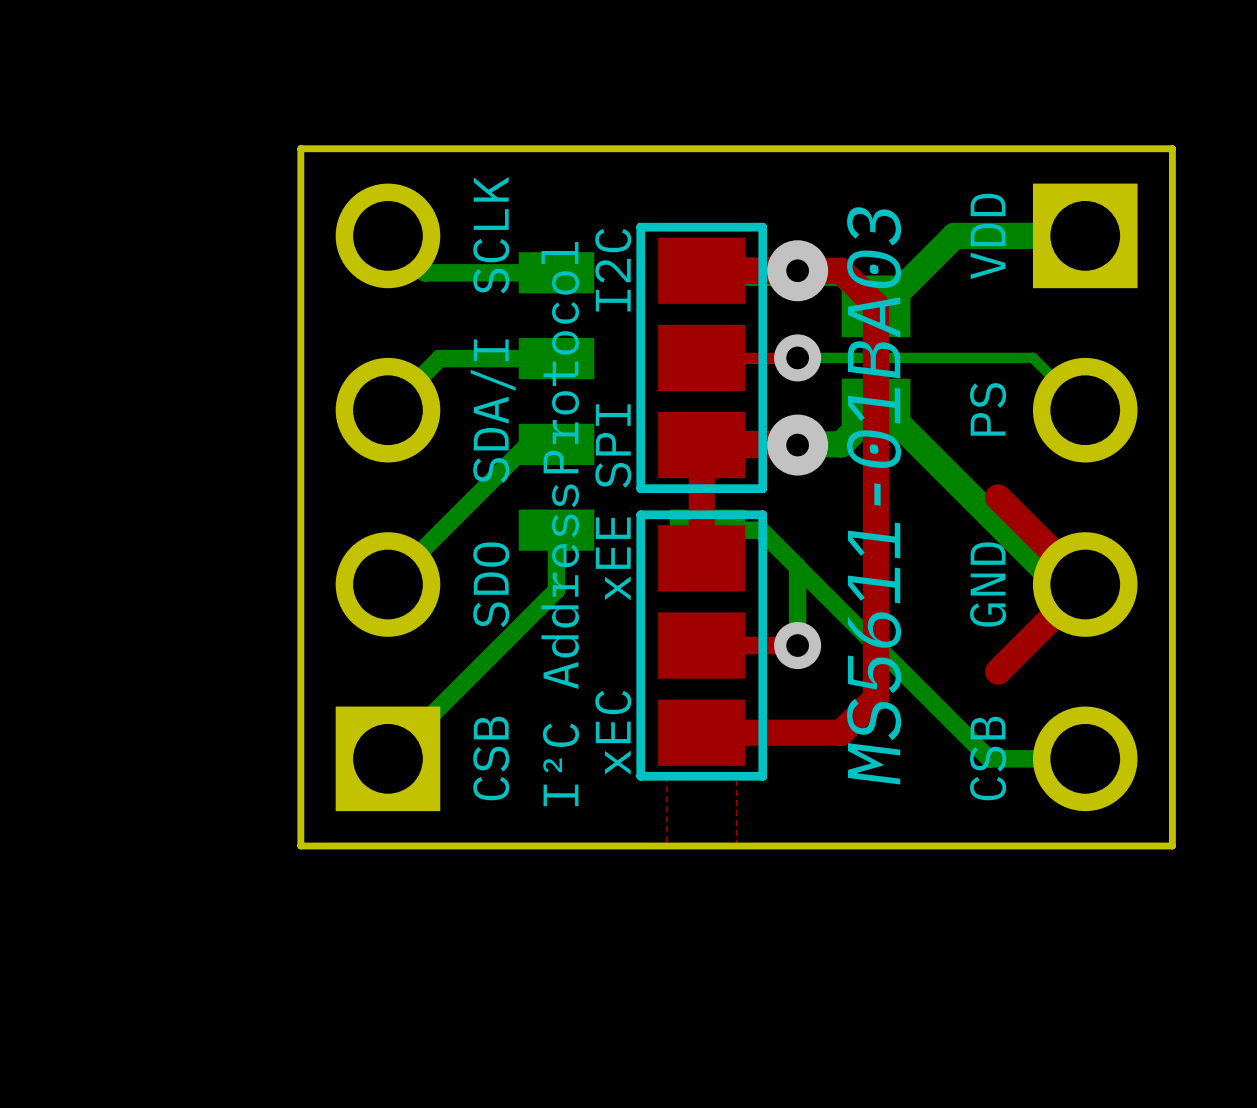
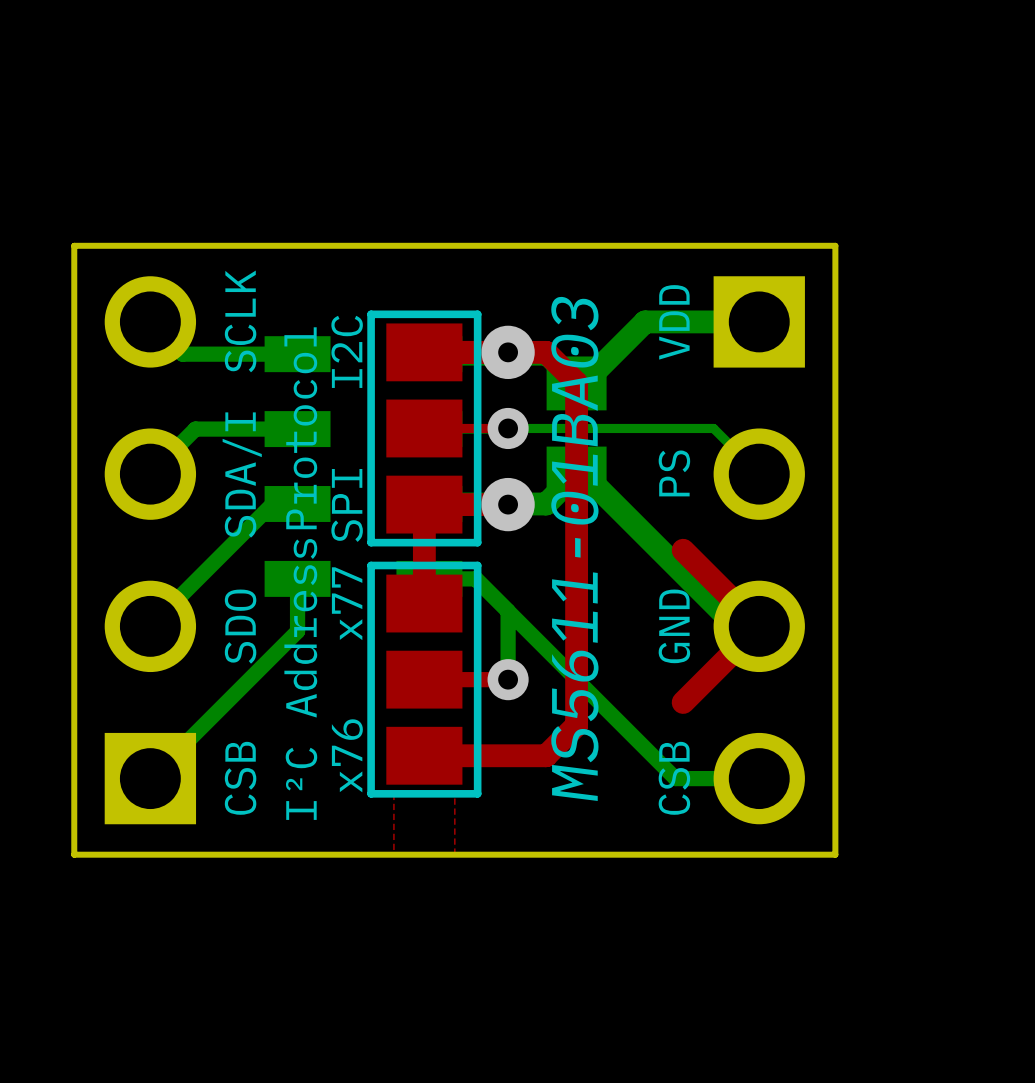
text: xEE (613, 558) -> x77 (347, 603)
text: xEC (613, 732) -> x76 (347, 755)

